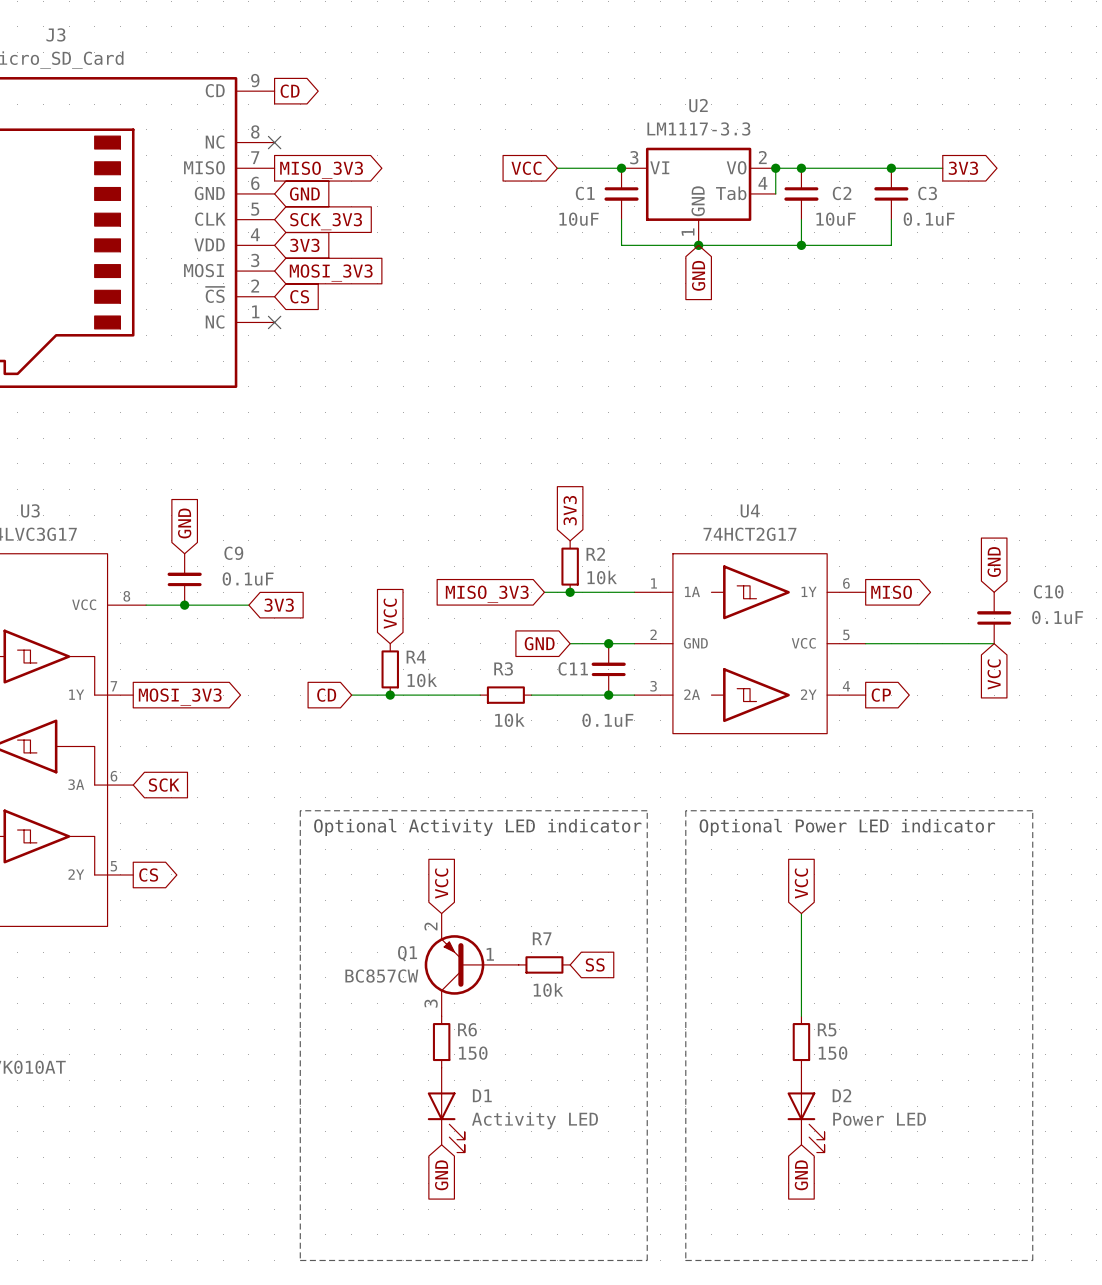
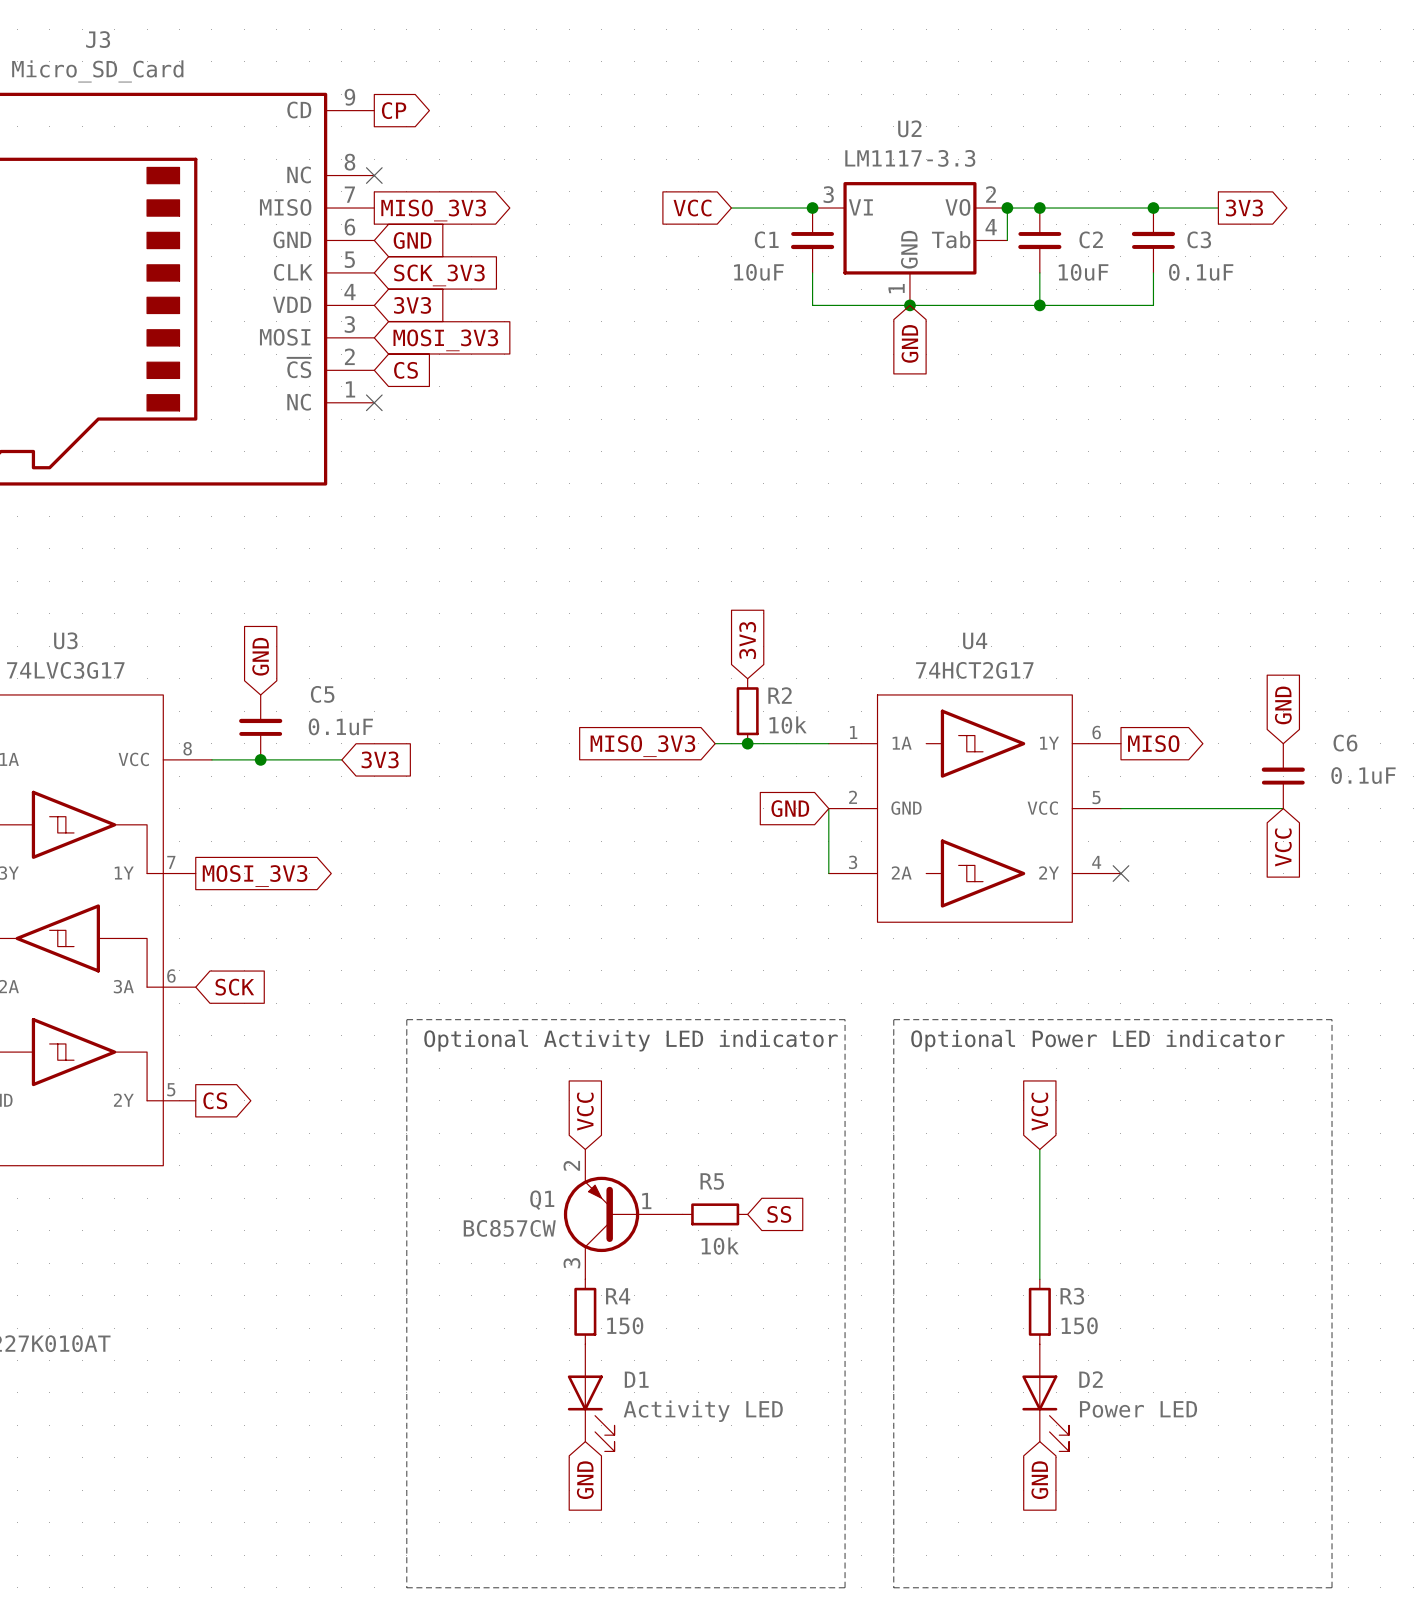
global label: CD (290, 91) -> CP (394, 110)
C9 name: C9 (233, 553) -> C5 (322, 694)
C10 name: C10 (1048, 591) -> C6 (1345, 743)
global label: VCC (390, 613) -> none
global label position: GND (539, 643) -> GND (790, 808)
wire: (570, 643) (634, 643) -> (828, 873) (828, 808)
junction: (608, 643) -> none
R4: 10k (390, 669) -> none
C11: 0.1uF (608, 669) -> none
global label: CD (326, 695) -> none
wire: (351, 695) (480, 695) -> none
junction: (390, 695) -> none
R3: 10k (505, 695) -> none
wire: (531, 695) (634, 695) -> none
junction: (608, 695) -> none
no-connect mark: none -> (1120, 873)
global label: CP (881, 695) -> none
R7 name: R7 (542, 938) -> R5 (712, 1181)
R6 name: R6 (467, 1029) -> R4 (618, 1296)
R5 name: R5 (827, 1029) -> R3 (1072, 1296)

